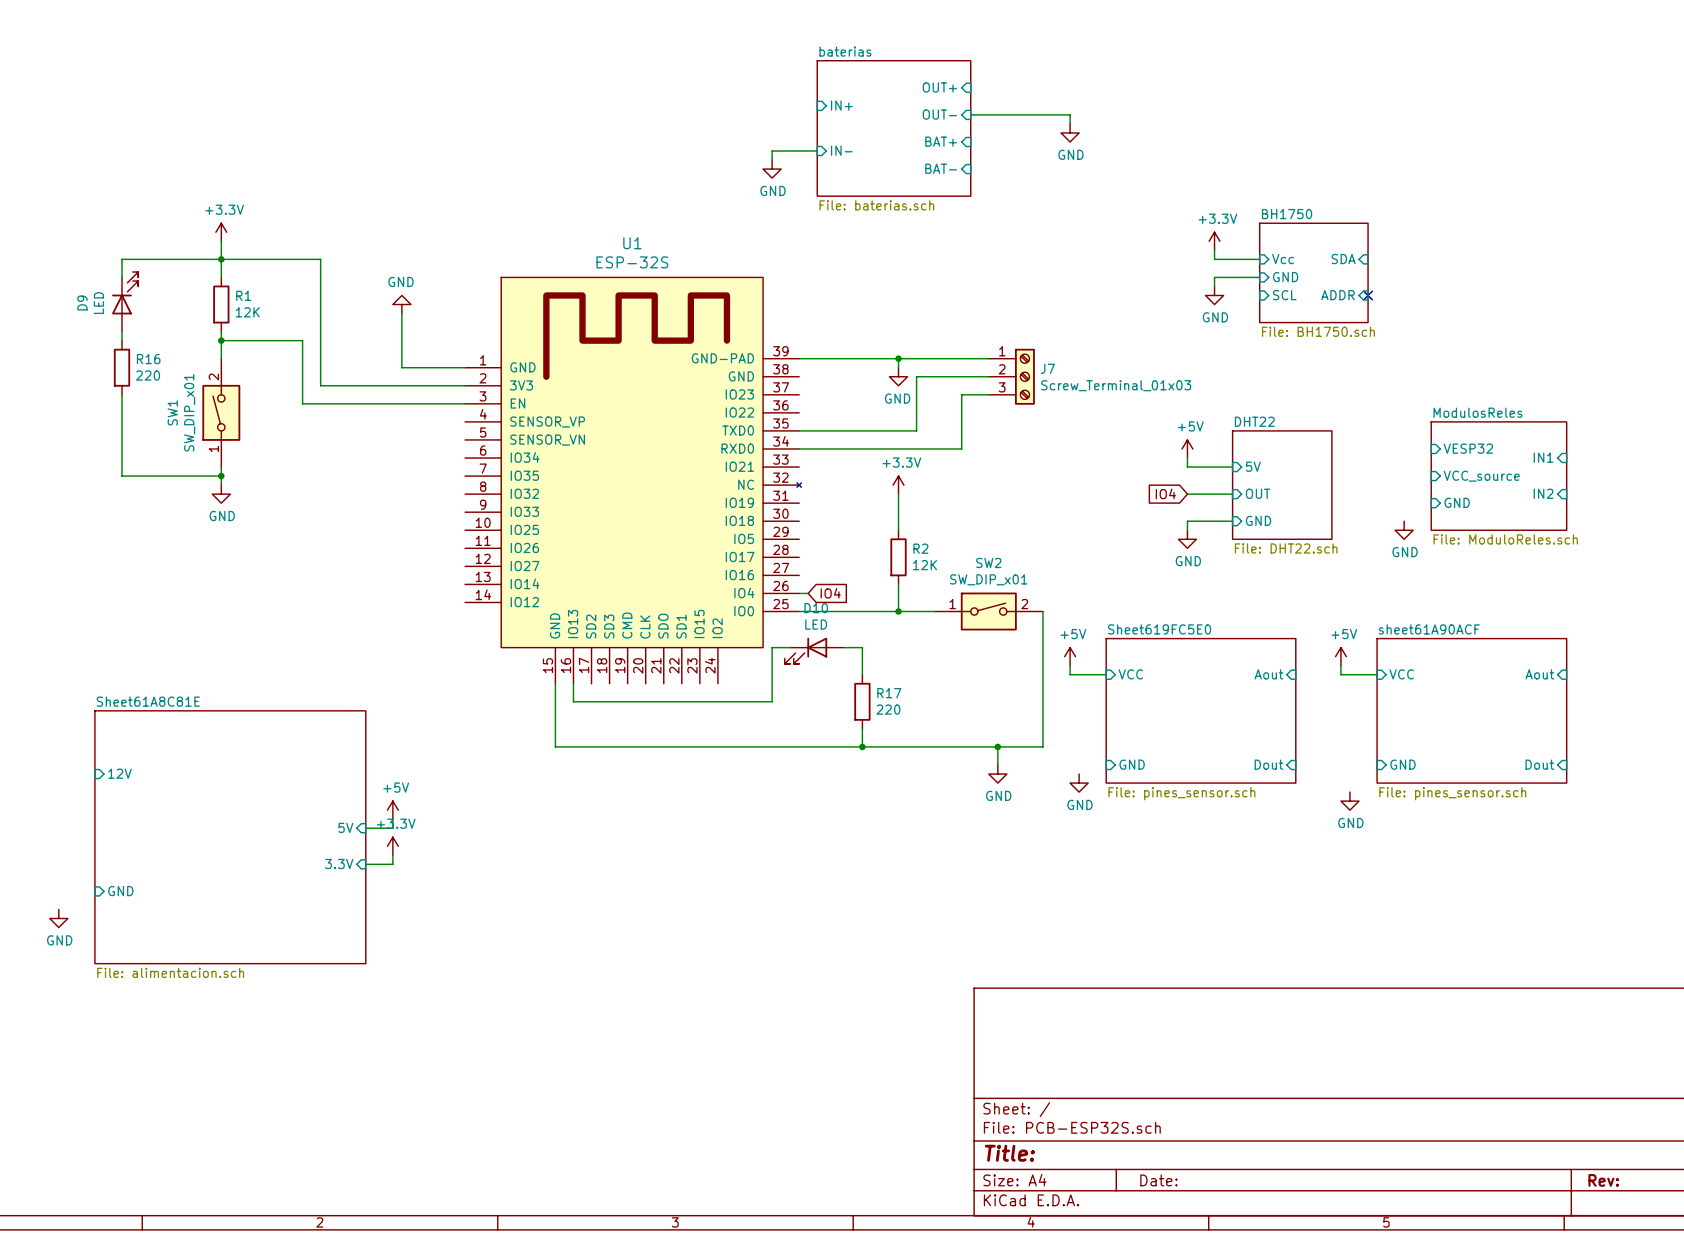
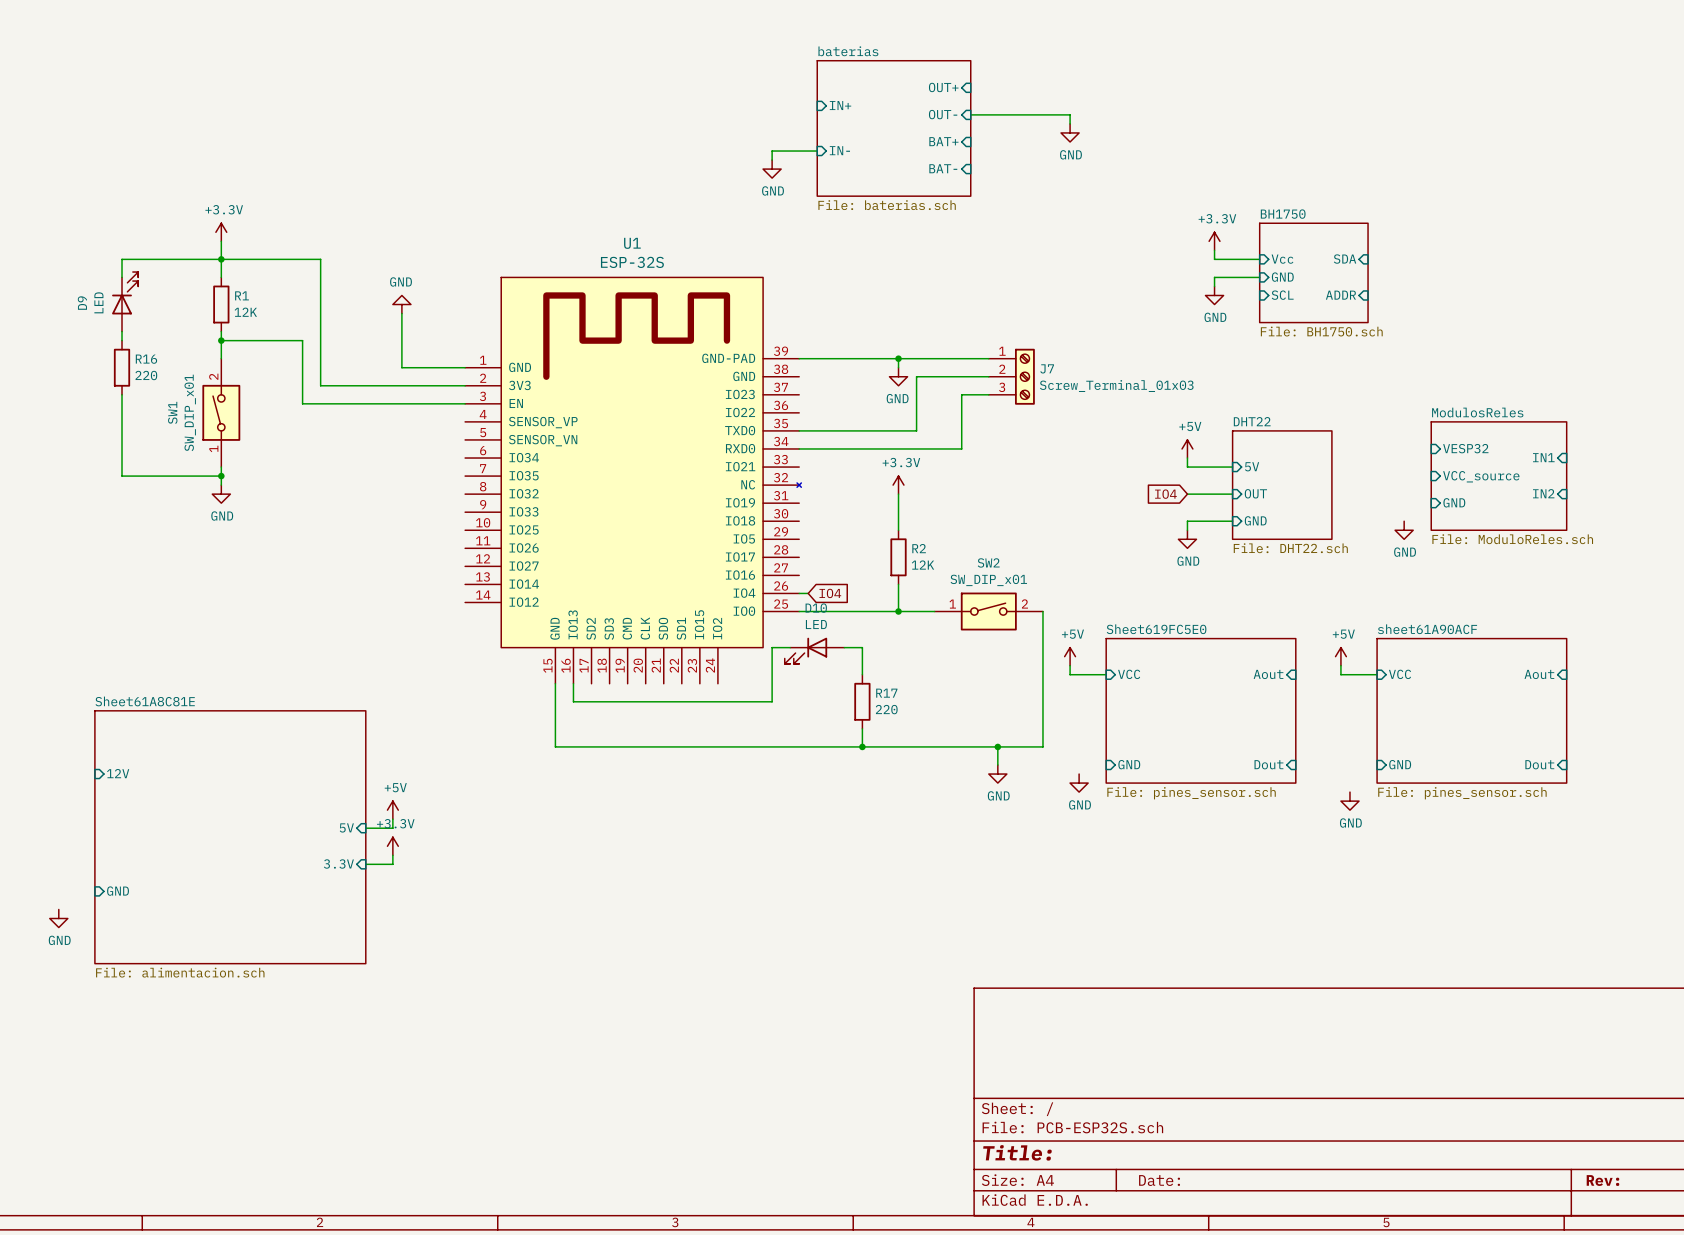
no-connect mark: (1368, 295) -> none

